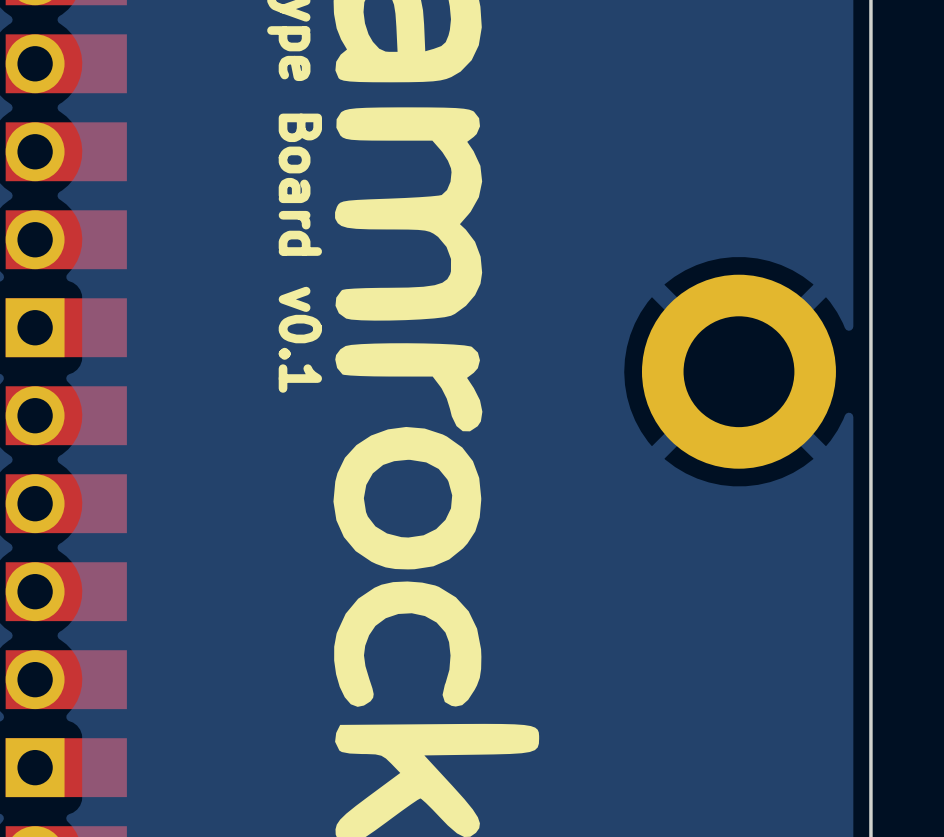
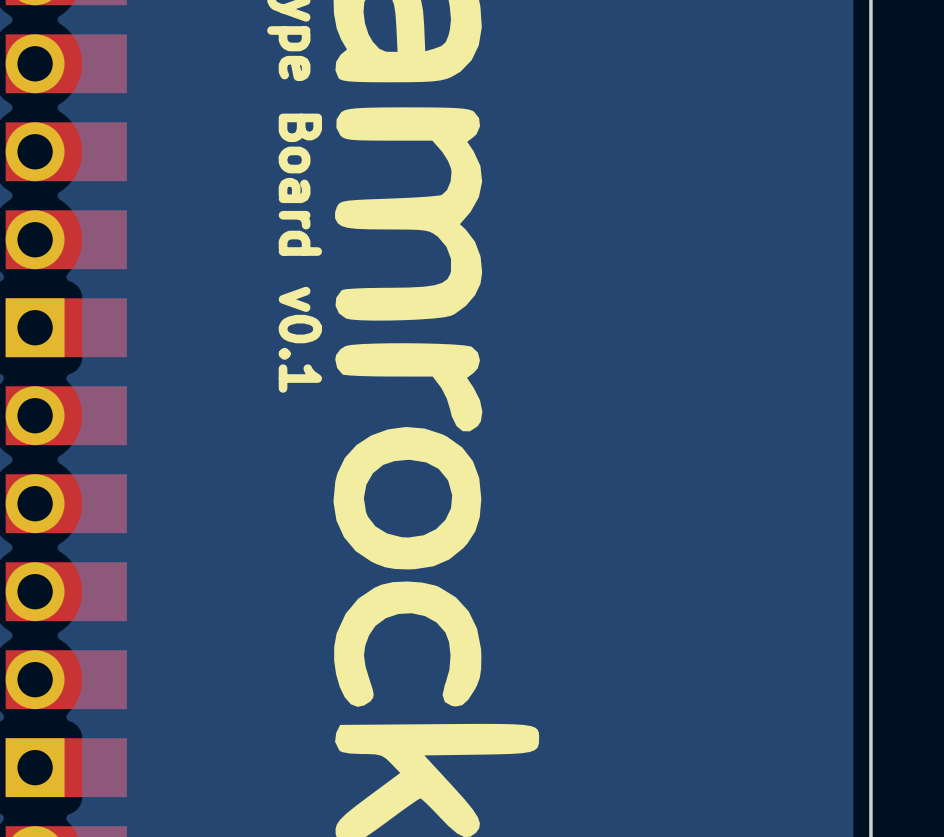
part: (738, 371) -> none

